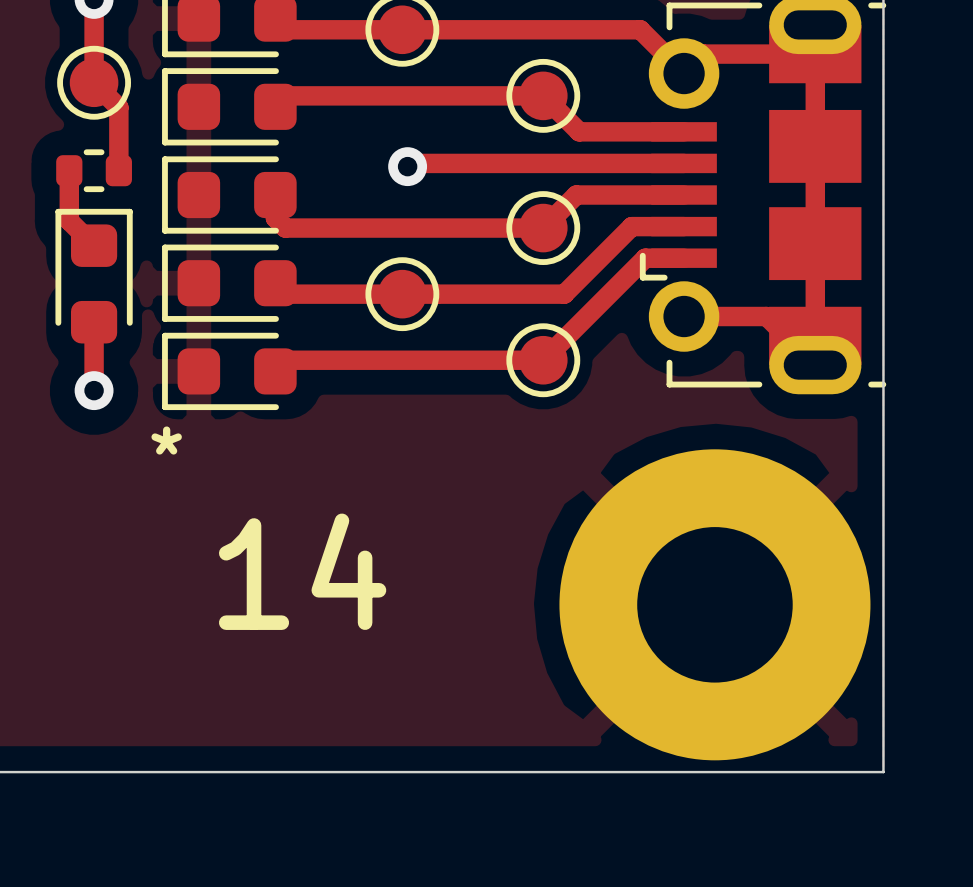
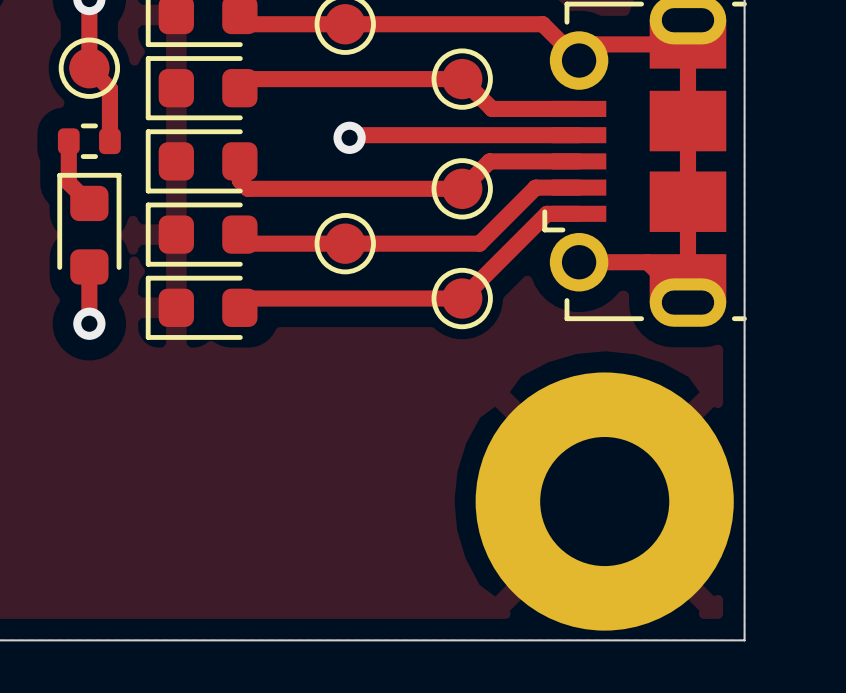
text: * (166, 440) -> none
text: 14 (302, 571) -> none

